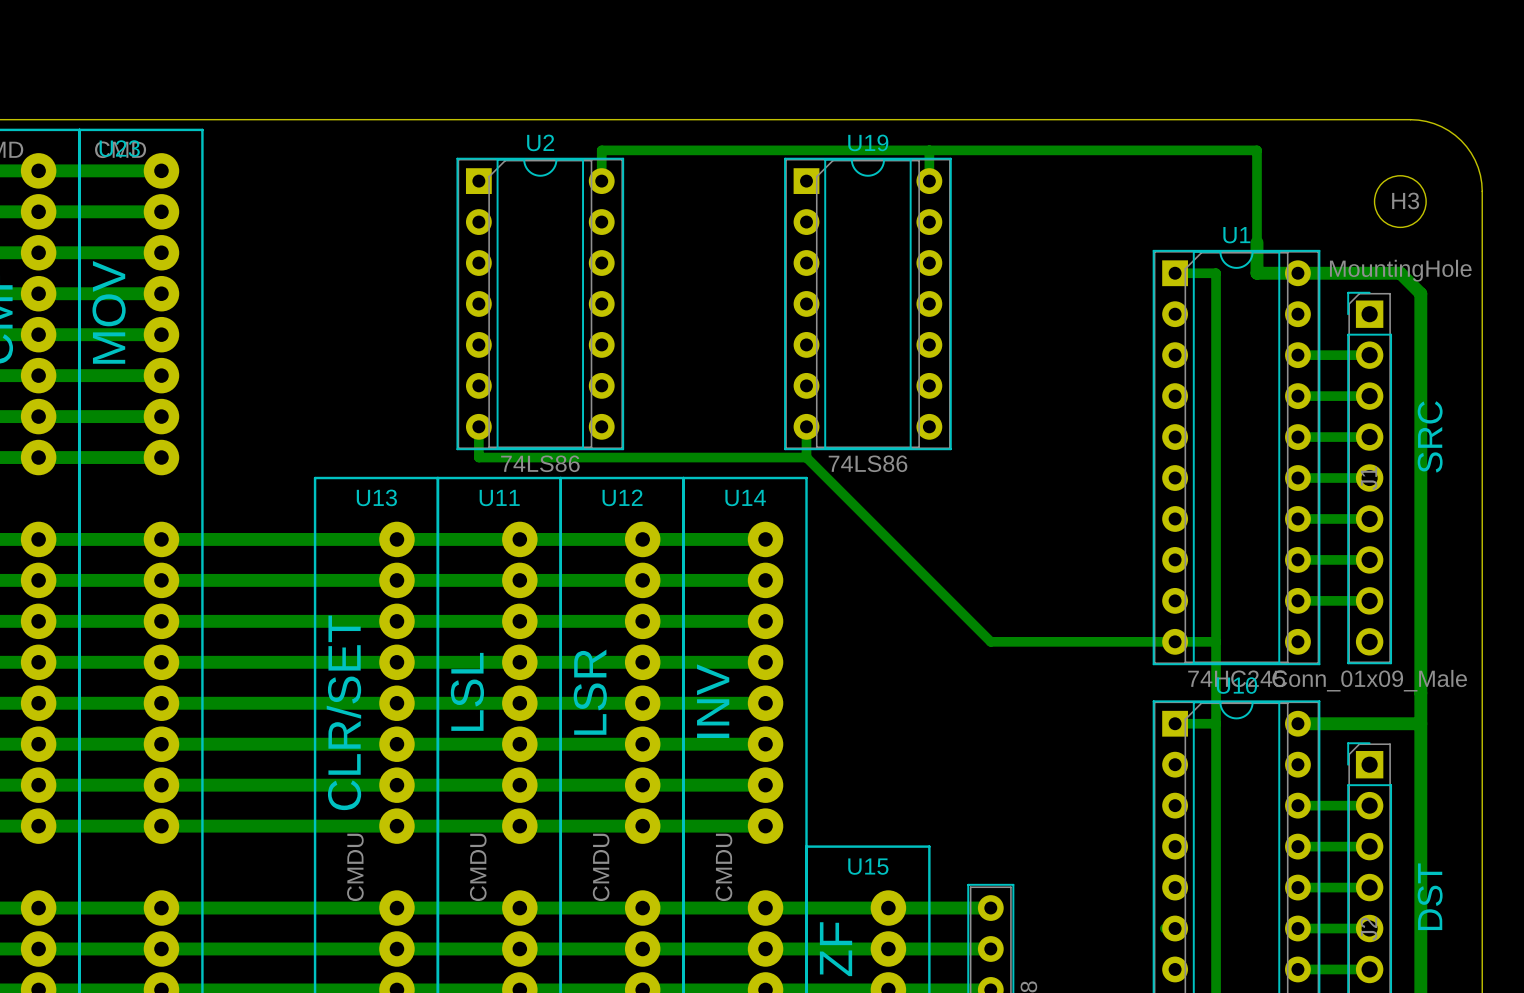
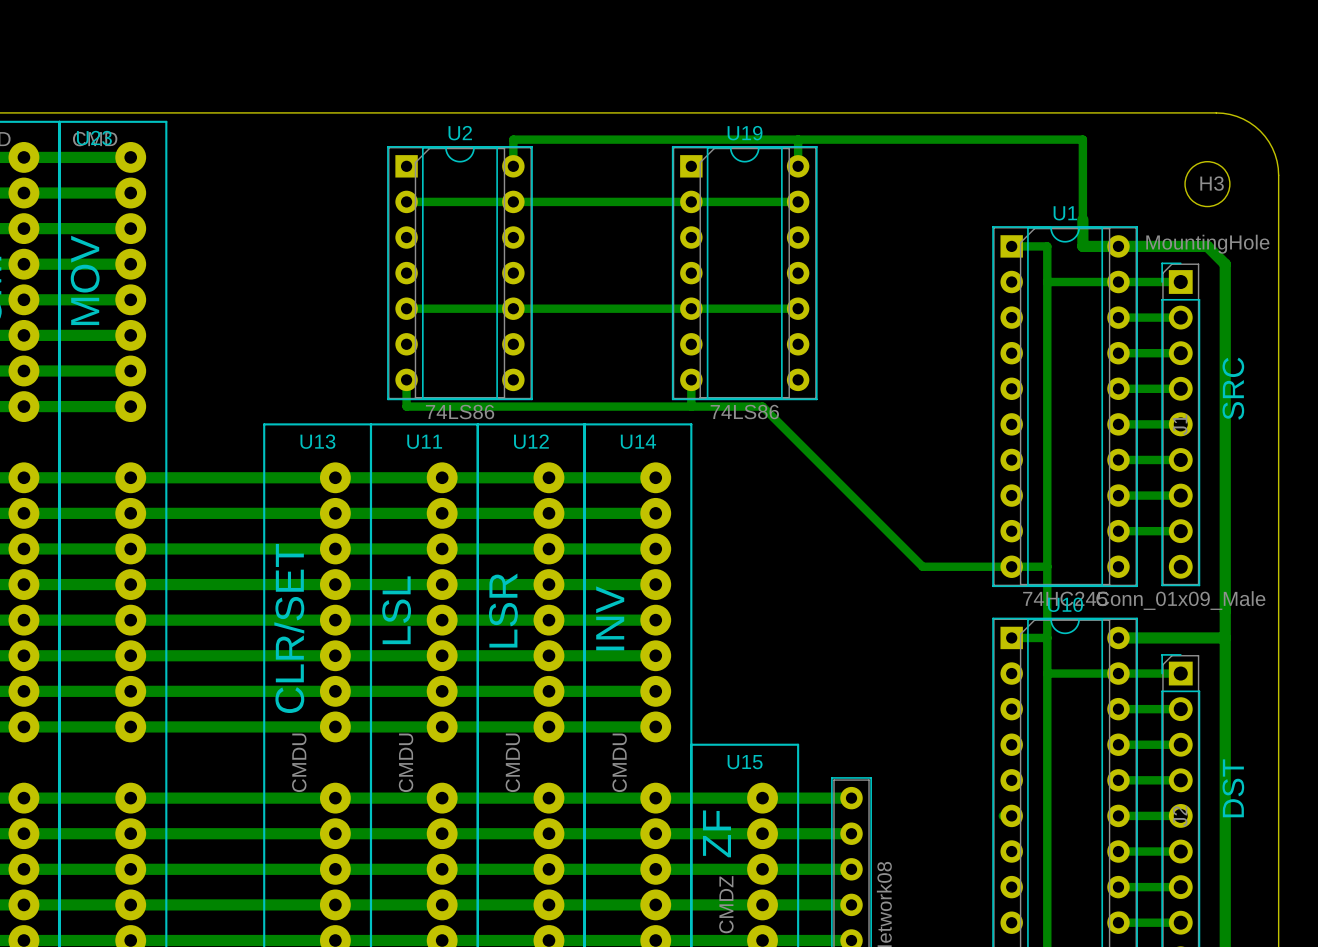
bottom track: none -> (406, 201) (798, 201)
bottom track: none -> (1047, 282) (1180, 282)
bottom track: none -> (406, 308) (798, 308)
bottom track: (806, 457) (990, 641) (1072, 641) -> (691, 406) (762, 406) (922, 566)
bottom track: none -> (1047, 673) (1180, 673)

